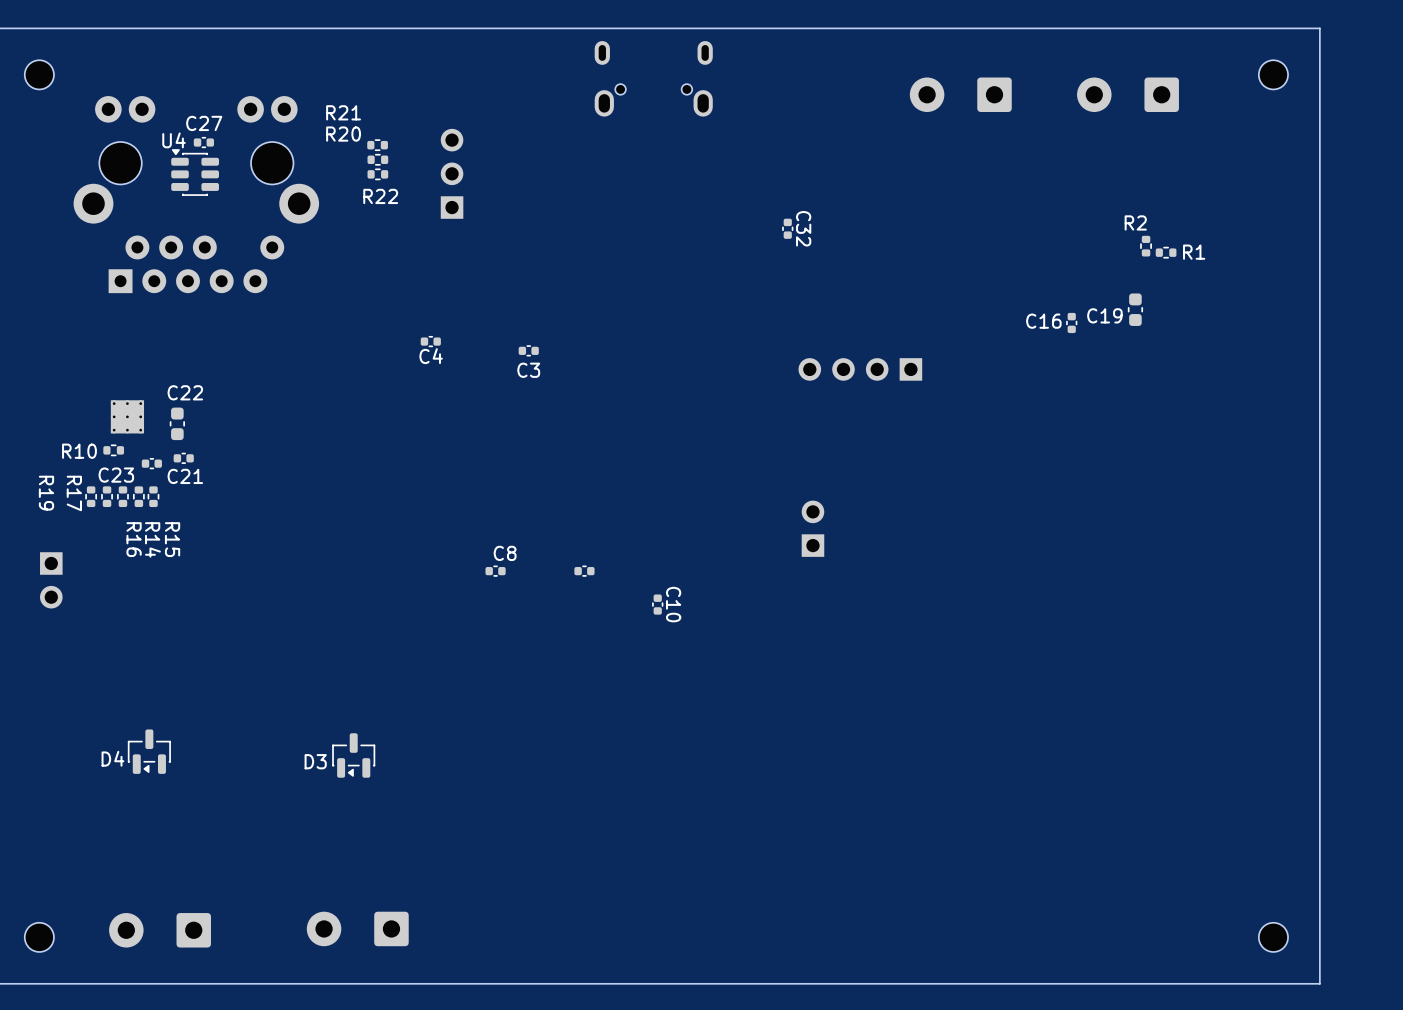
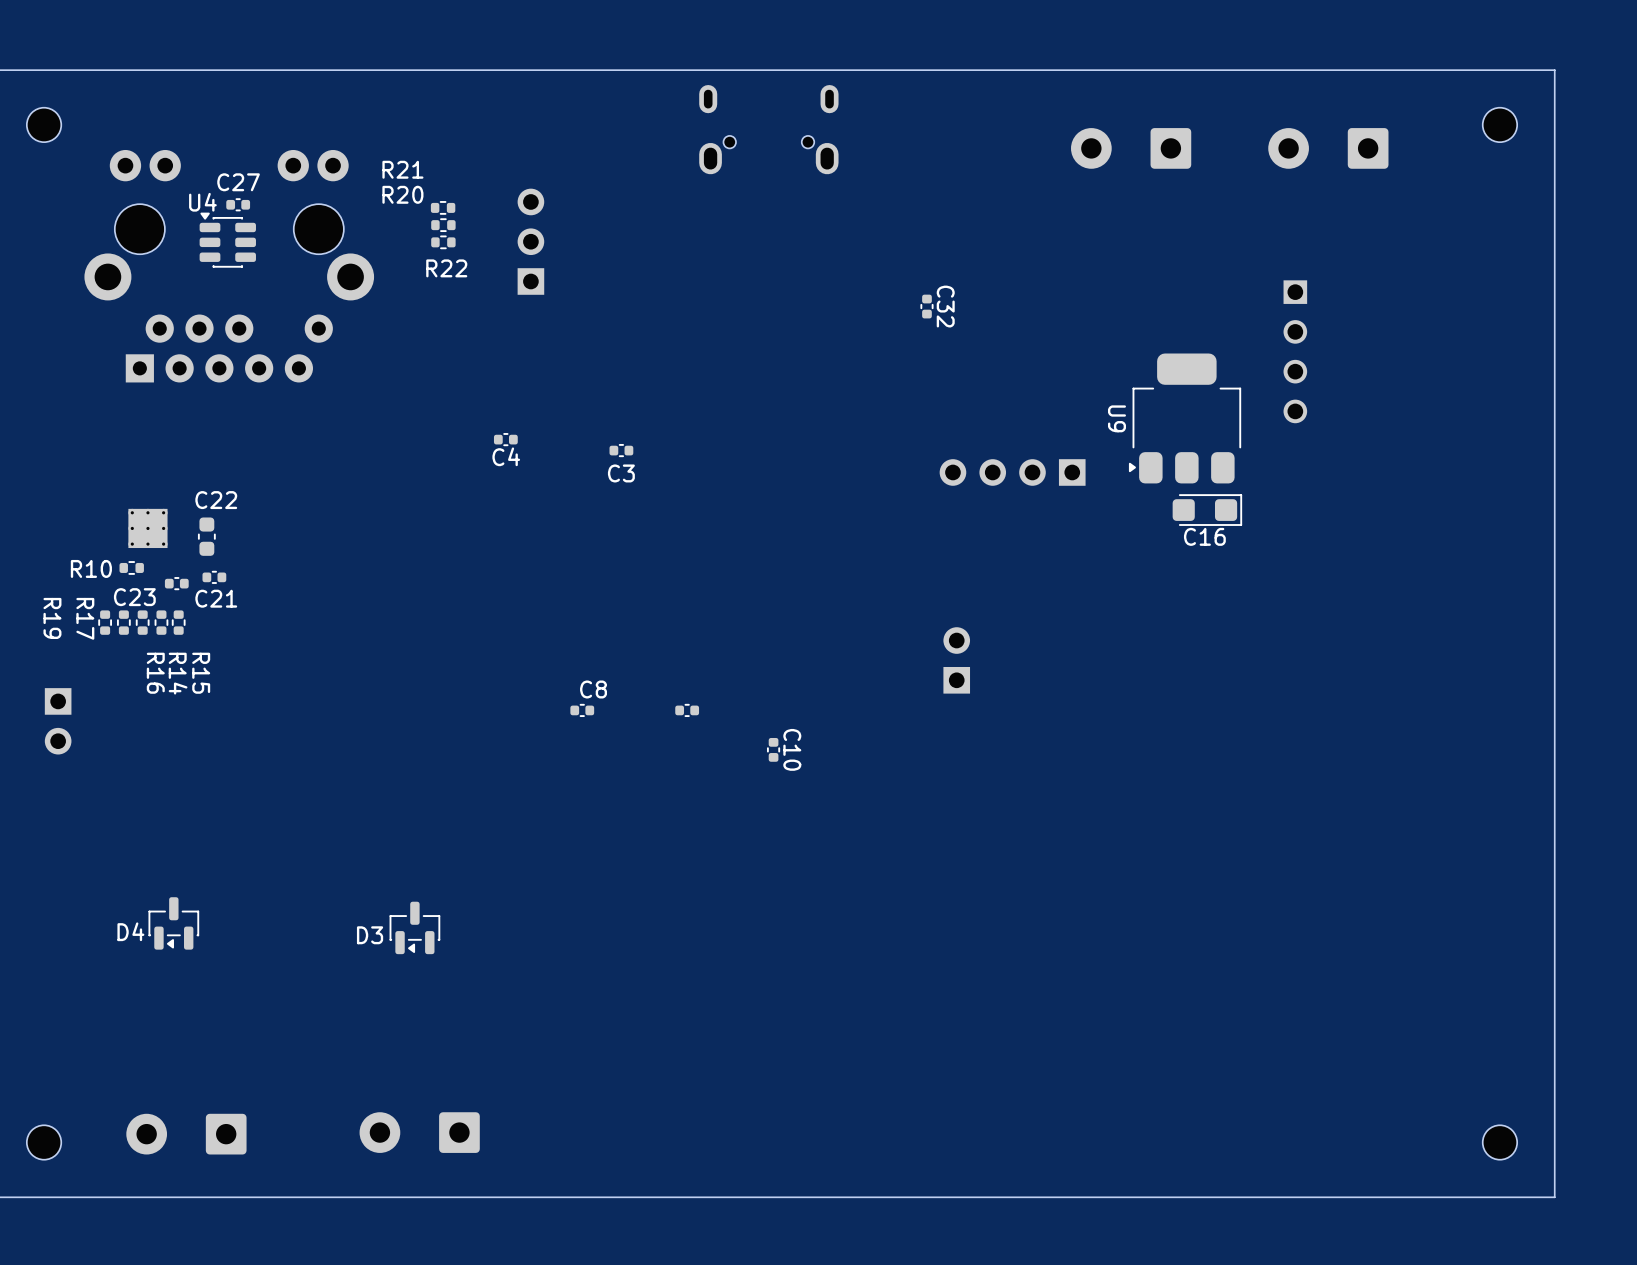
R2: (1146, 246) -> none
R1: (1166, 252) -> none
part: none -> (1295, 351)
C19: (1135, 309) -> none
C16 footprint: [1066, 312, 1078, 334] -> [1172, 494, 1243, 526]
C16 name position: C16 (1043, 321) -> C16 (1204, 536)
U9: none -> (1185, 418)

